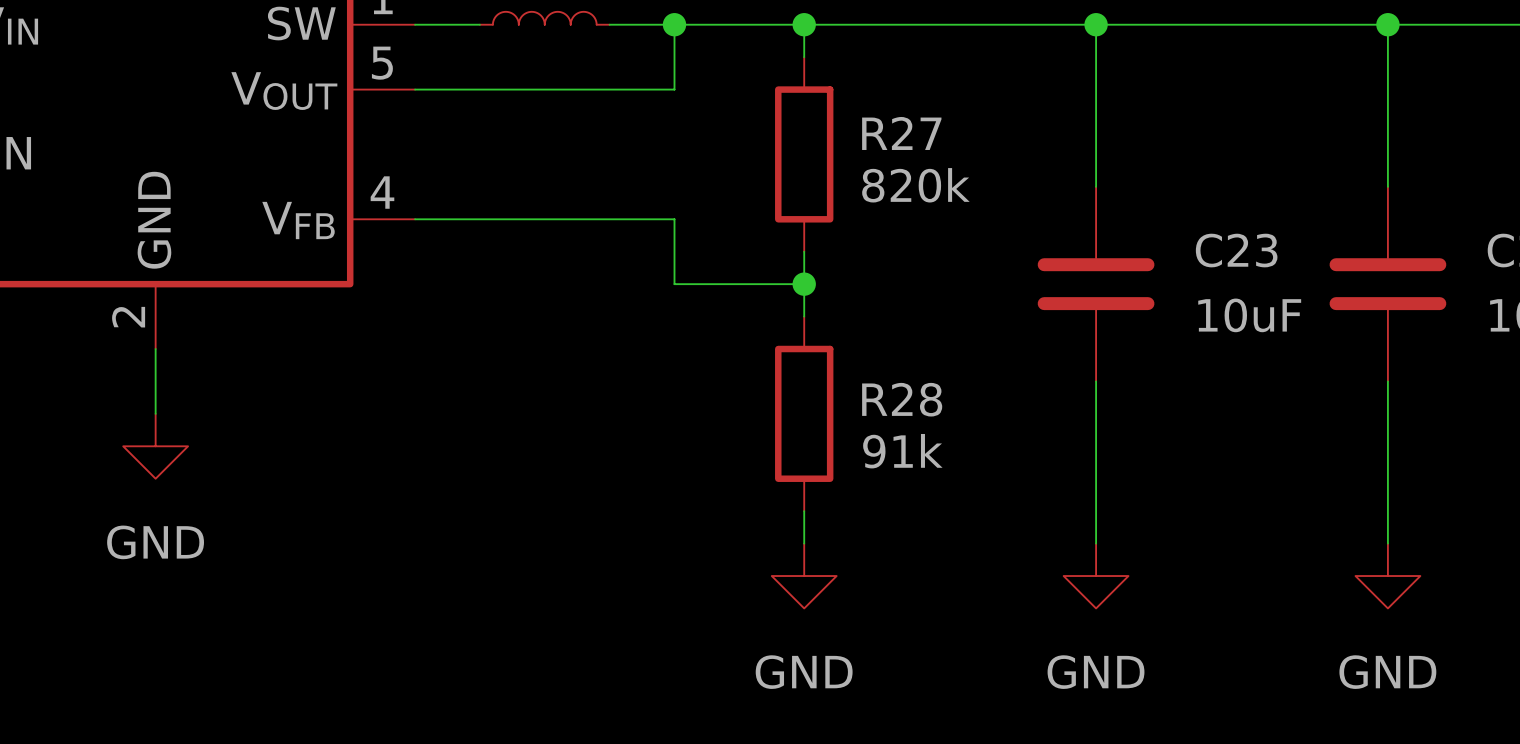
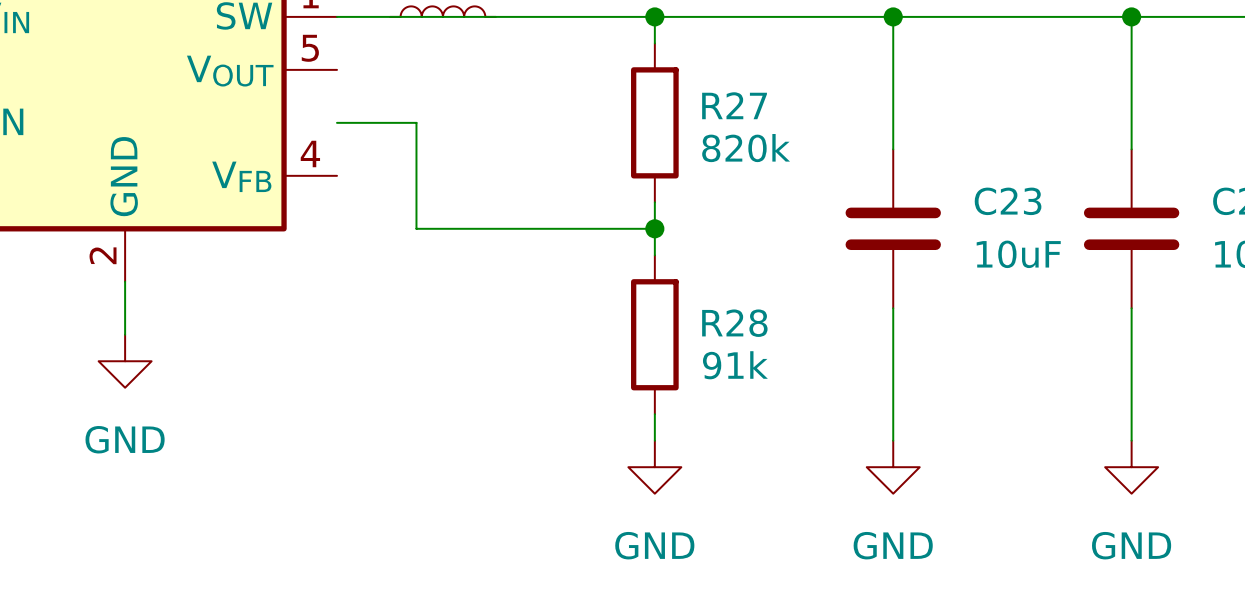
wire: none -> (389, 16) (495, 16)
wire: (674, 24) (674, 89) (415, 89) -> none
junction: (674, 24) -> none
wire: (415, 219) (674, 219) (674, 284) -> (337, 122) (416, 122) (416, 228) (548, 228)

